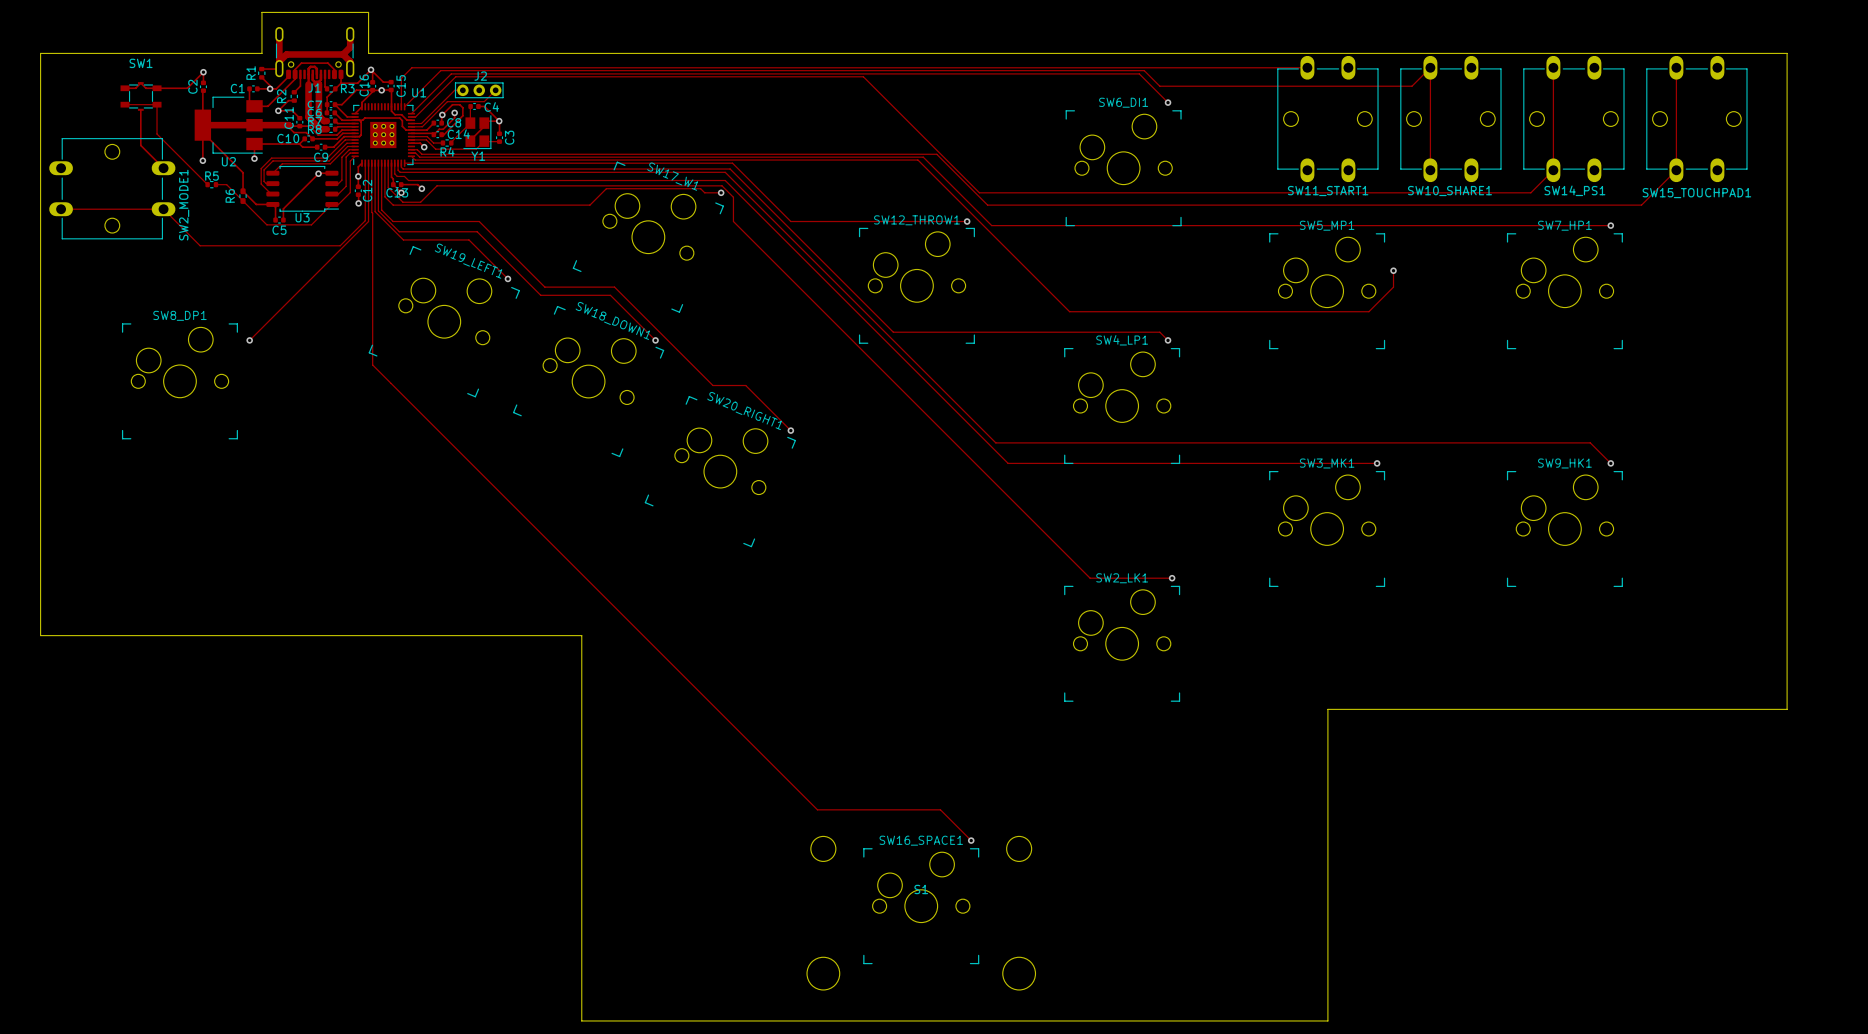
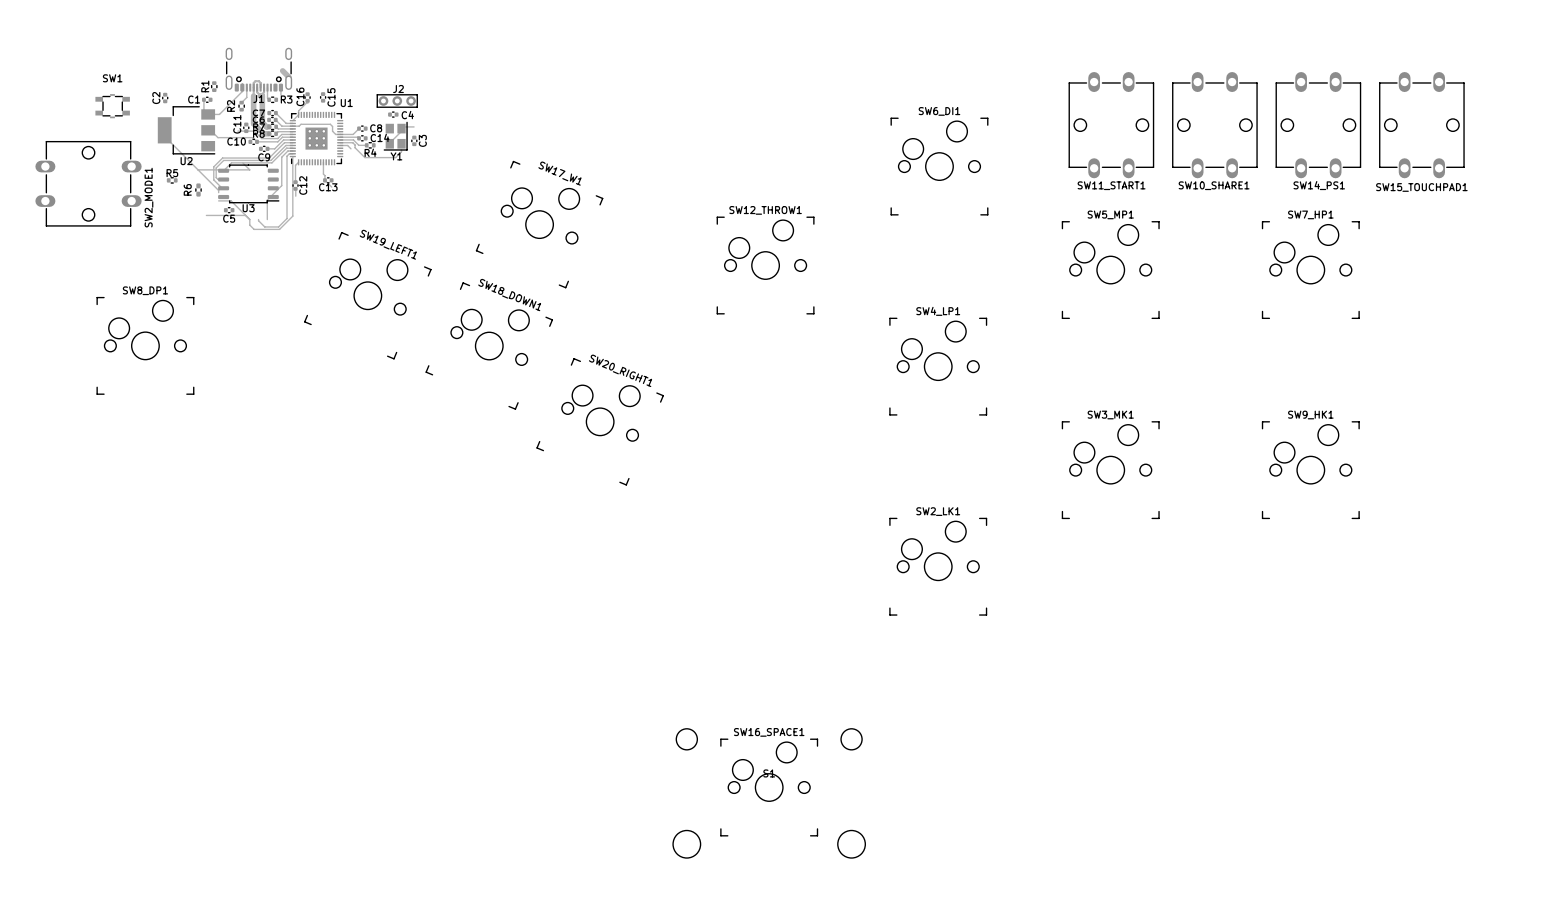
board edge: (261, 12) (261, 53) (40, 53) (40, 635) (581, 635) (581, 1020) (1327, 1020) (1327, 709) (1787, 709) (1787, 53) (368, 53) (368, 12) (261, 12) -> none
track: (279, 34) (279, 68) (261, 69) -> none
track: (350, 34) (350, 47) (343, 54) (286, 54) (279, 61) -> none
track: (1307, 67) (411, 67) (401, 78) (401, 106) -> none
track: (1553, 67) (1553, 170) (1530, 192) (979, 192) (863, 76) (455, 76) (415, 116) (411, 116) -> none
track: (1676, 67) (1676, 170) (1641, 205) (987, 205) (936, 154) (421, 154) (417, 149) (411, 149) -> none
track: (295, 69) (301, 63) (327, 63) (334, 70) -> none
via: (371, 69) -> none
track: (372, 71) (372, 82) -> none
via: (203, 72) -> none
track: (288, 74) (276, 88) (257, 88) -> none
track: (261, 77) (270, 85) (270, 88) -> none
track: (391, 82) (383, 82) (371, 69) (357, 83) (341, 83) (327, 97) (326, 112) -> none
track: (204, 84) (203, 72) (187, 88) (145, 88) (140, 83) (135, 88) (125, 88) -> none
via: (270, 88) -> none
track: (203, 90) (202, 125) (288, 125) (294, 132) (307, 133) -> (210, 130) (217, 137) (252, 137)
track: (372, 90) (356, 90) (341, 104) (334, 104) -> none
via: (381, 90) -> none
track: (462, 90) (454, 90) (421, 123) (411, 123) -> none
track: (495, 90) (484, 101) (447, 101) (422, 126) (411, 126) -> none
track: (294, 100) (288, 100) (278, 110) (292, 110) (299, 118) -> none
track: (361, 102) (372, 90) (391, 89) (391, 111) (395, 114) (401, 114) (407, 120) (411, 120) -> (298, 111) (308, 103)
track: (1168, 102) (1139, 73) (451, 73) (411, 113) -> none
via: (1168, 102) -> none
track: (125, 104) (157, 104) (157, 134) (207, 184) -> none
track: (404, 106) (440, 70) (1144, 70) (1159, 86) (1411, 86) (1430, 67) (1430, 170) -> none
track: (470, 106) (470, 123) (451, 143) -> none
track: (478, 106) (484, 106) (499, 121) (499, 133) -> none
track: (140, 109) (140, 145) (163, 168) -> none
via: (278, 110) -> none
track: (454, 112) (454, 117) (443, 129) (439, 129) (433, 134) -> none
via: (454, 112) -> none
via: (442, 114) -> none
track: (359, 120) (361, 134) (355, 136) -> none
via: (499, 121) -> none
track: (441, 123) (441, 115) (452, 104) (459, 104) (462, 107) (462, 115) (444, 134) (441, 134) -> none
track: (202, 132) (202, 160) -> none
track: (304, 138) (299, 144) -> none
track: (499, 141) (484, 141) (476, 149) (435, 149) (429, 142) -> (401, 150) (395, 157) (364, 157) (355, 147) (355, 144)
track: (299, 144) (302, 147) (317, 147) -> none
track: (299, 144) (254, 144) (254, 158) -> none
via: (424, 147) -> none
track: (351, 153) (346, 157) (346, 186) (338, 194) (331, 194) -> (289, 153) (287, 156) (287, 218) (278, 226) (264, 226) (258, 219)
track: (411, 153) (415, 153) (419, 157) (923, 157) (991, 225) (1610, 225) -> none
track: (355, 156) (350, 161) (350, 192) (338, 204) (331, 204) (311, 224) (266, 224) (226, 184) (215, 184) -> (292, 156) (292, 216) (279, 229) (254, 229) (249, 225) (249, 219) (231, 200) (218, 200)
track: (411, 156) (415, 160) (917, 160) (1069, 311) (1368, 311) (1393, 287) (1393, 270) -> none
track: (341, 157) (341, 180) (338, 183) (331, 183) -> (281, 157) (281, 185) (267, 200) (267, 219)
via: (254, 158) -> none
via: (202, 160) -> none
track: none -> (242, 162) (249, 169) (198, 169)
track: (365, 163) (365, 220) (340, 245) (200, 245) (163, 209) (61, 209) -> none
track: (368, 163) (368, 221) (249, 340) -> none
track: (371, 163) (372, 365) (817, 809) (940, 809) (971, 840) -> none
track: (375, 163) (375, 211) (403, 239) (469, 239) (507, 278) -> none
track: (378, 163) (378, 210) (399, 231) (477, 231) (540, 295) (610, 295) (655, 340) -> none
track: (381, 163) (381, 210) (393, 221) (479, 221) (544, 287) (614, 287) (712, 385) (745, 385) (790, 430) -> none
track: (384, 163) (384, 196) (393, 205) (589, 205) (606, 188) (700, 188) (704, 192) (721, 192) -> none
track: (388, 163) (388, 187) (402, 202) (420, 202) (437, 185) (722, 185) (733, 197) (733, 221) (1090, 578) (1172, 578) -> none
track: (394, 163) (394, 173) (397, 176) (404, 176) (408, 180) (725, 180) (1008, 463) (1377, 463) -> none
track: (398, 163) (398, 170) (400, 172) (725, 172) (995, 442) (1590, 442) (1610, 463) -> none
track: (401, 163) (403, 169) (730, 169) (893, 332) (1159, 332) (1168, 340) -> none
track: (404, 163) (732, 163) (790, 221) (967, 221) -> none
track: (243, 172) (243, 191) (256, 204) (272, 204) (275, 207) (275, 220) -> (198, 170) (218, 192)
via: (318, 173) -> none
track: (331, 173) (319, 173) (283, 208) (283, 220) -> none
via: (358, 176) -> none
track: (401, 184) (417, 184) (421, 188) -> none
via: (421, 188) -> none
via: (401, 192) -> none
via: (721, 192) -> none
via: (358, 203) -> none
via: (967, 221) -> none
via: (1610, 225) -> none
track: none -> (206, 215) (245, 215)
via: (1393, 270) -> none
via: (507, 278) -> none
via: (249, 340) -> none
via: (655, 340) -> none
via: (1168, 340) -> none
via: (790, 430) -> none
via: (1377, 463) -> none
via: (1610, 463) -> none
via: (1172, 578) -> none
via: (971, 840) -> none

